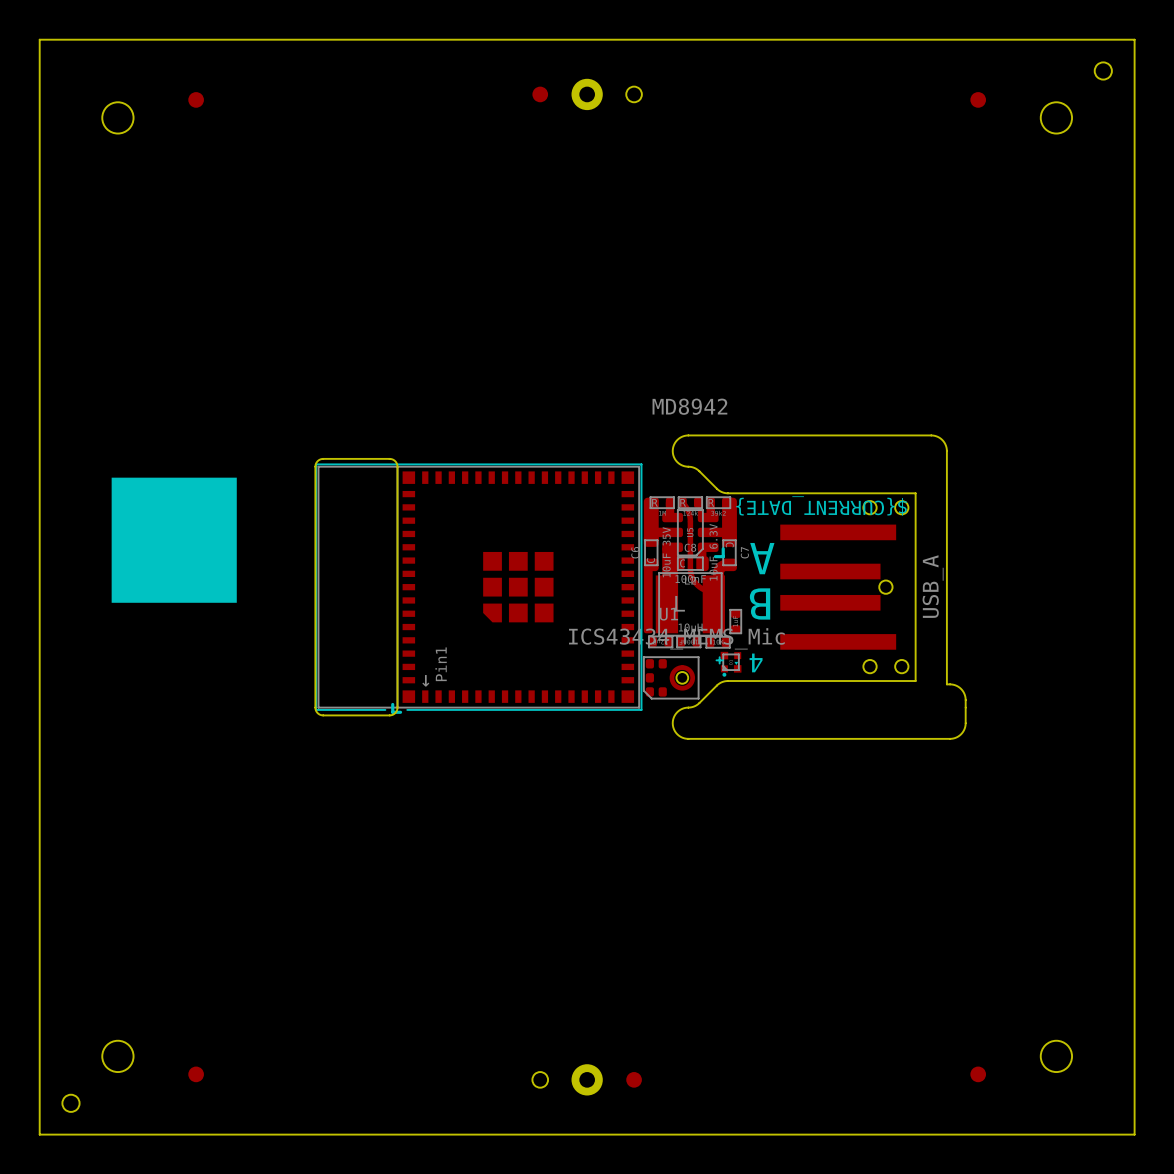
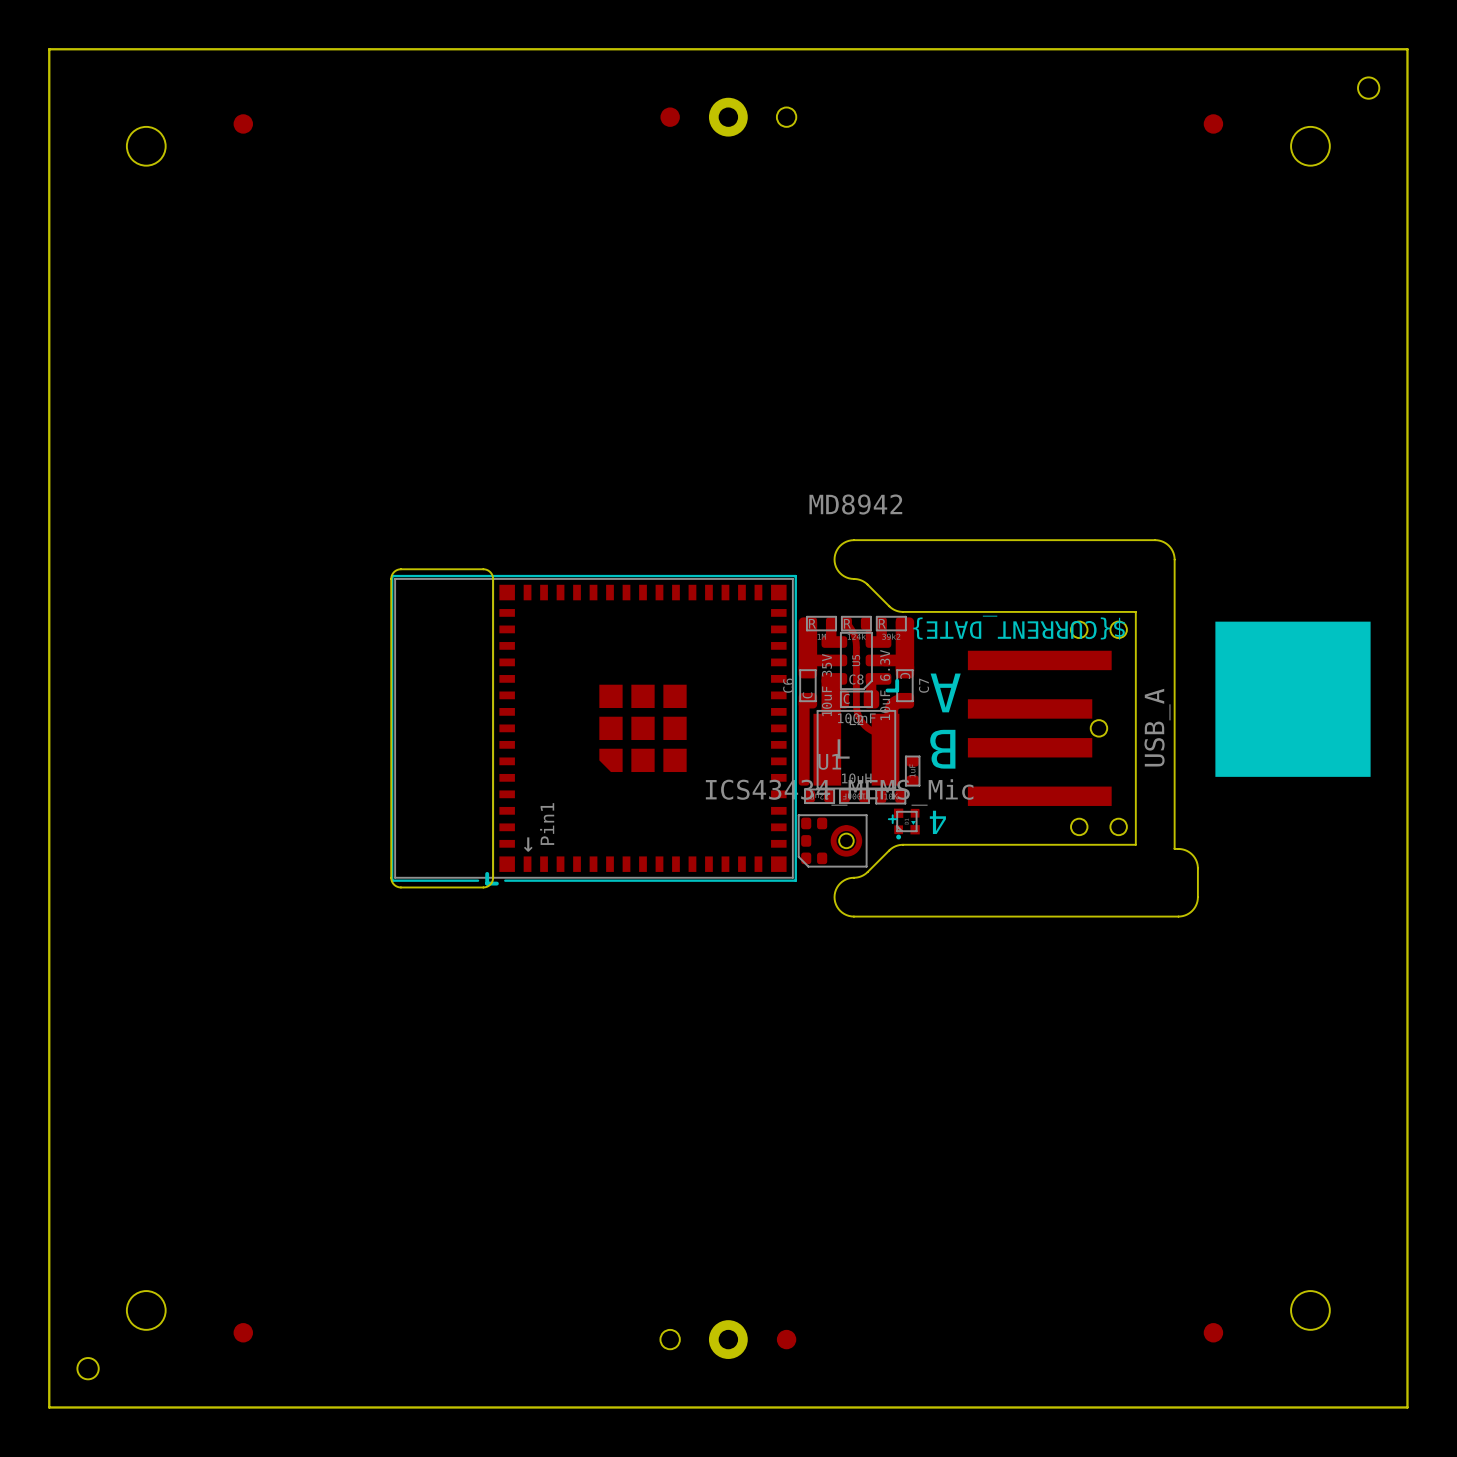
drawing: [111, 477, 237, 603] -> none
drawing: none -> [1215, 621, 1371, 777]

